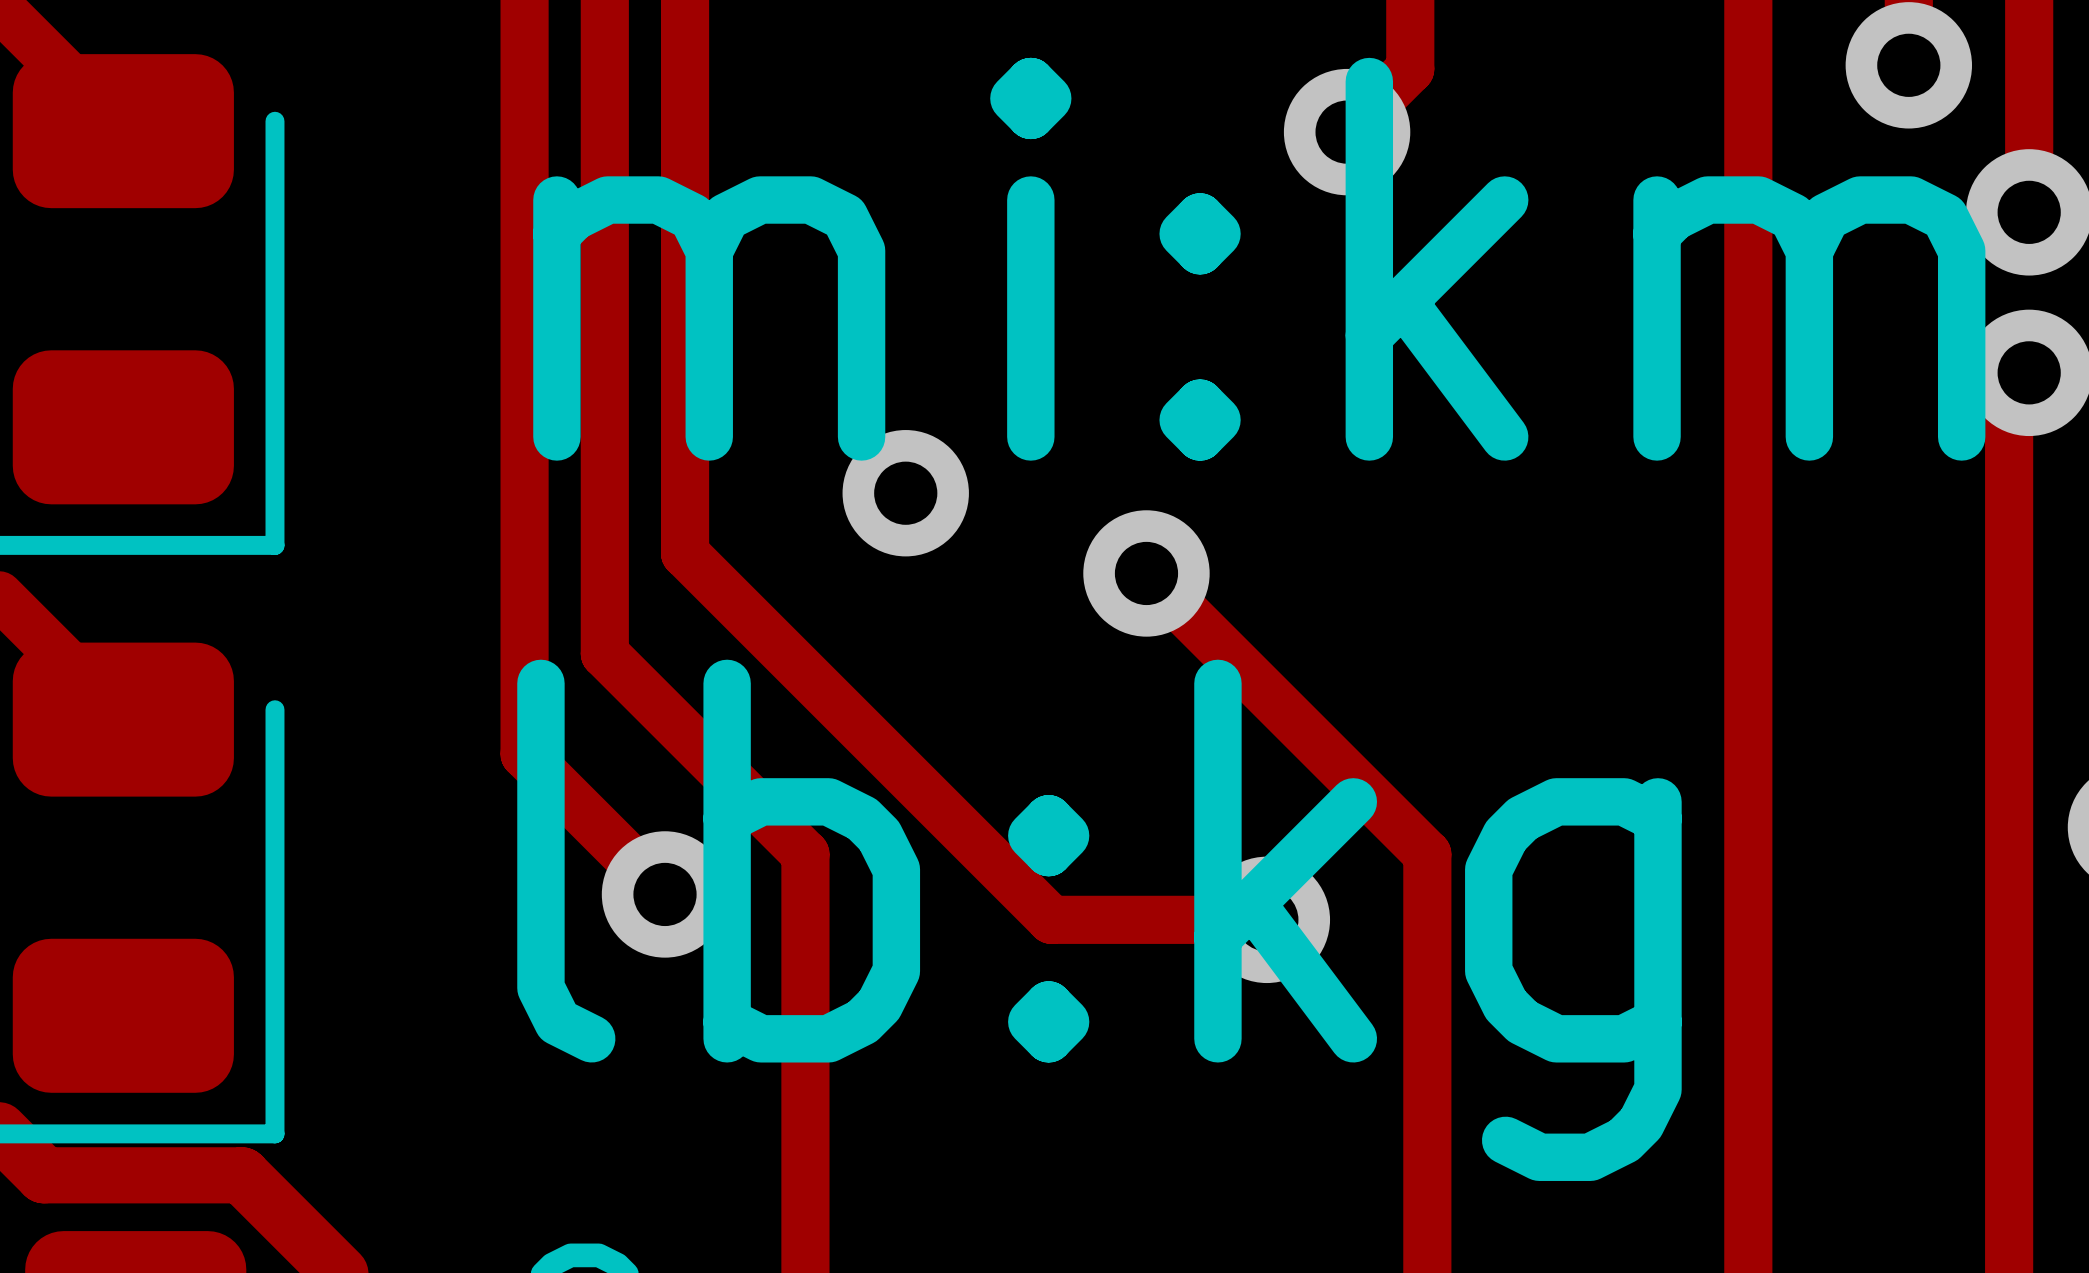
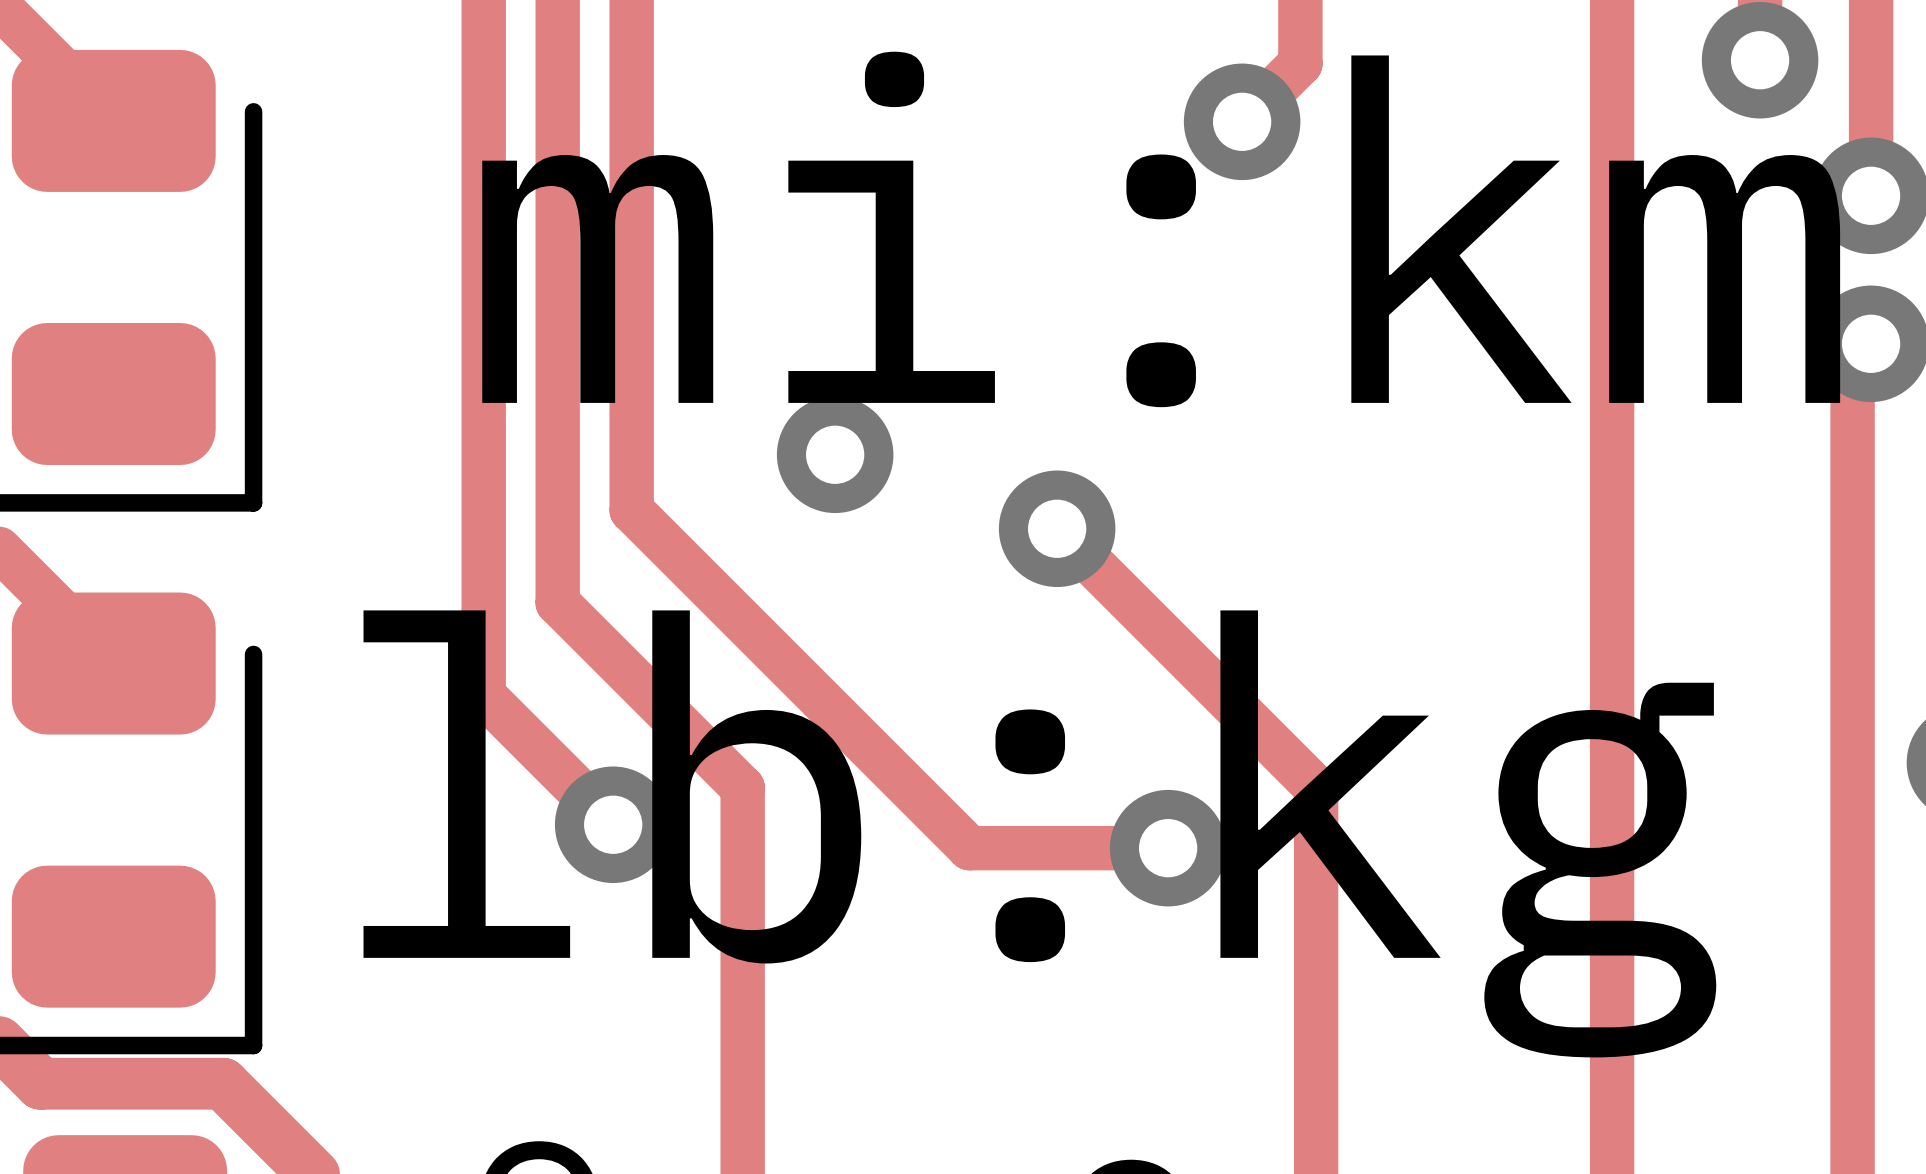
text position: lb:kg (1099, 920) -> lb:kg (1039, 833)

